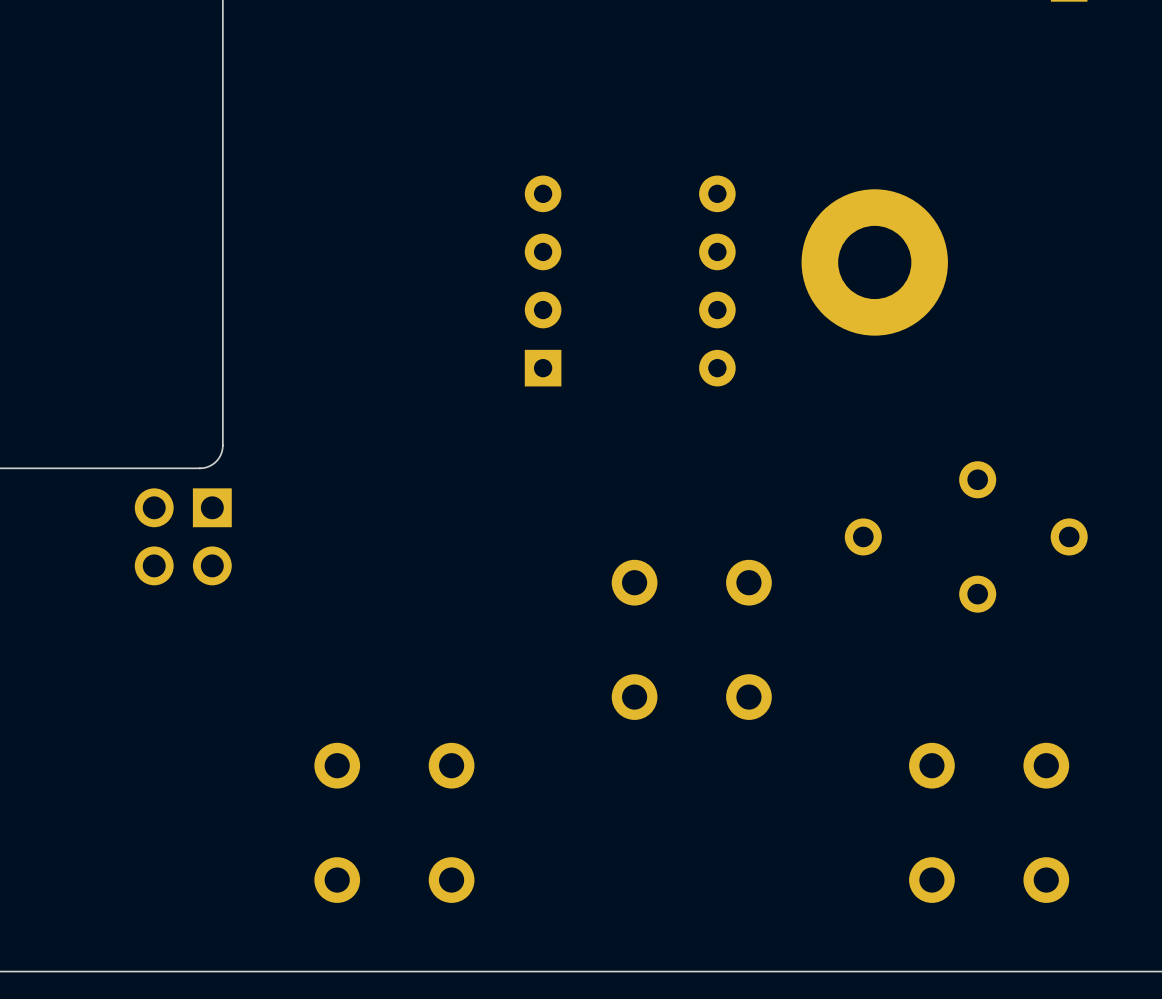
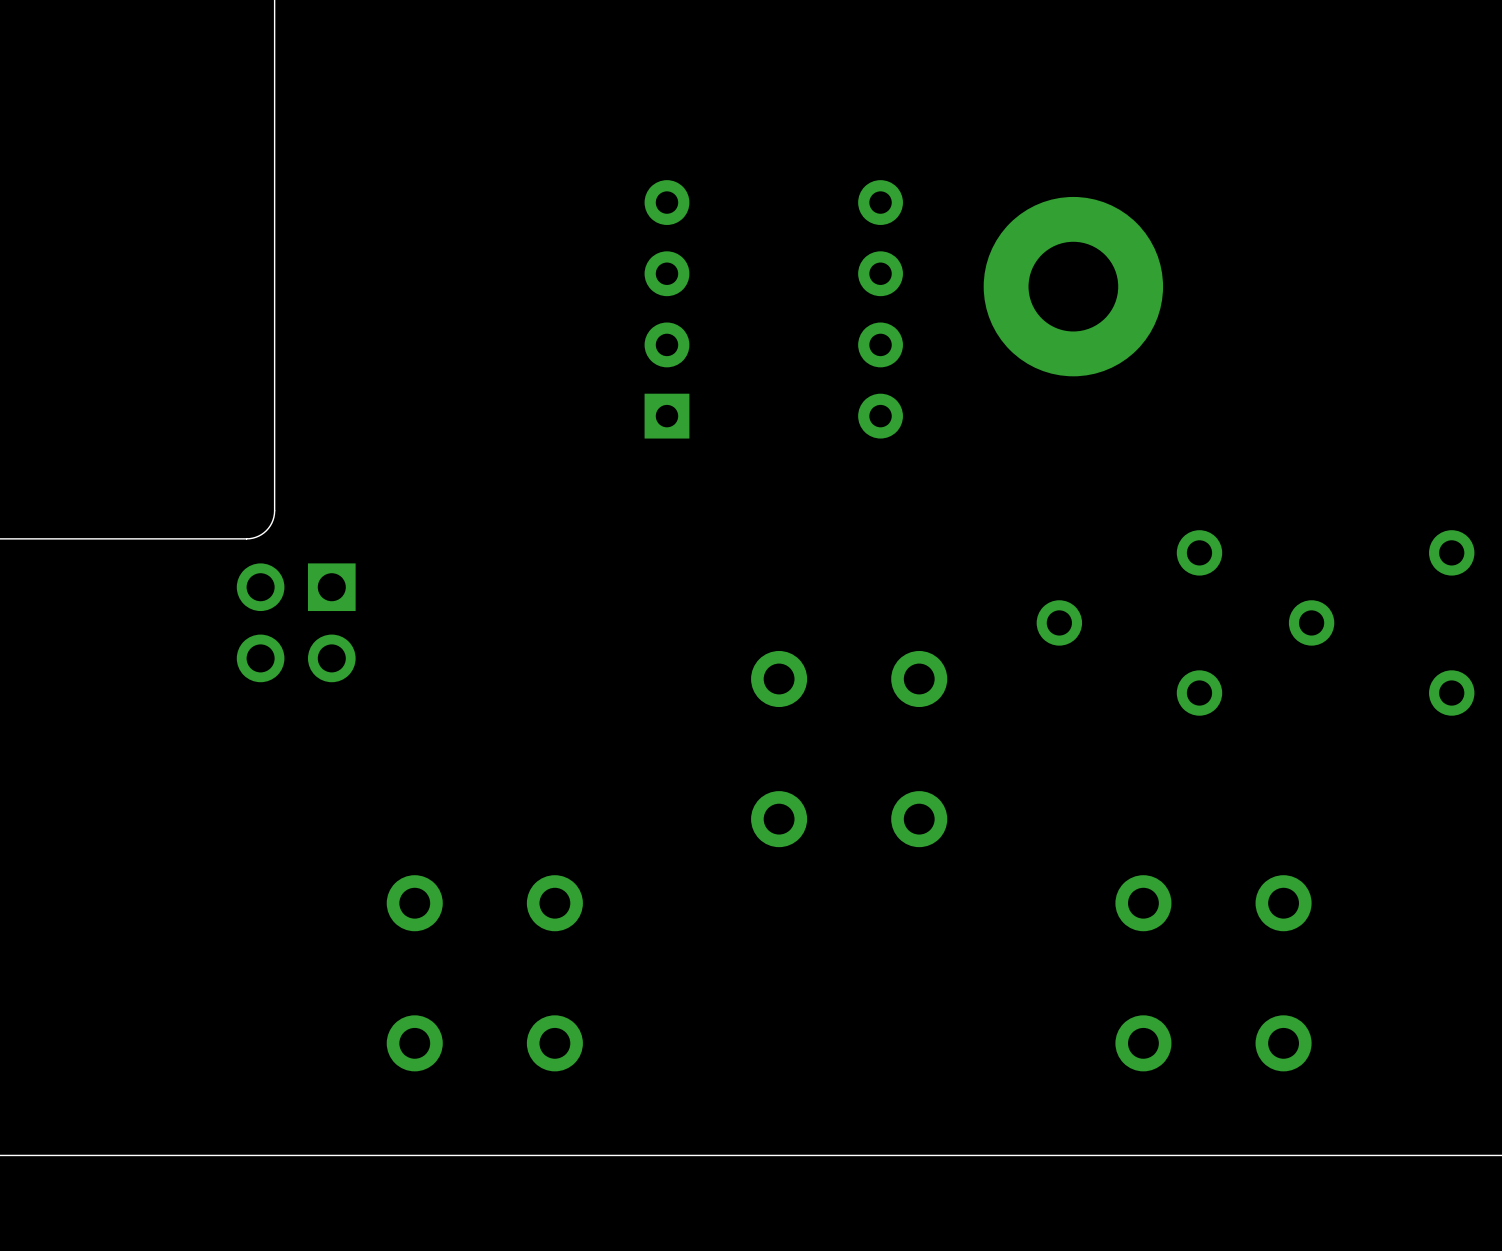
part position: (183, 536) -> (296, 622)

